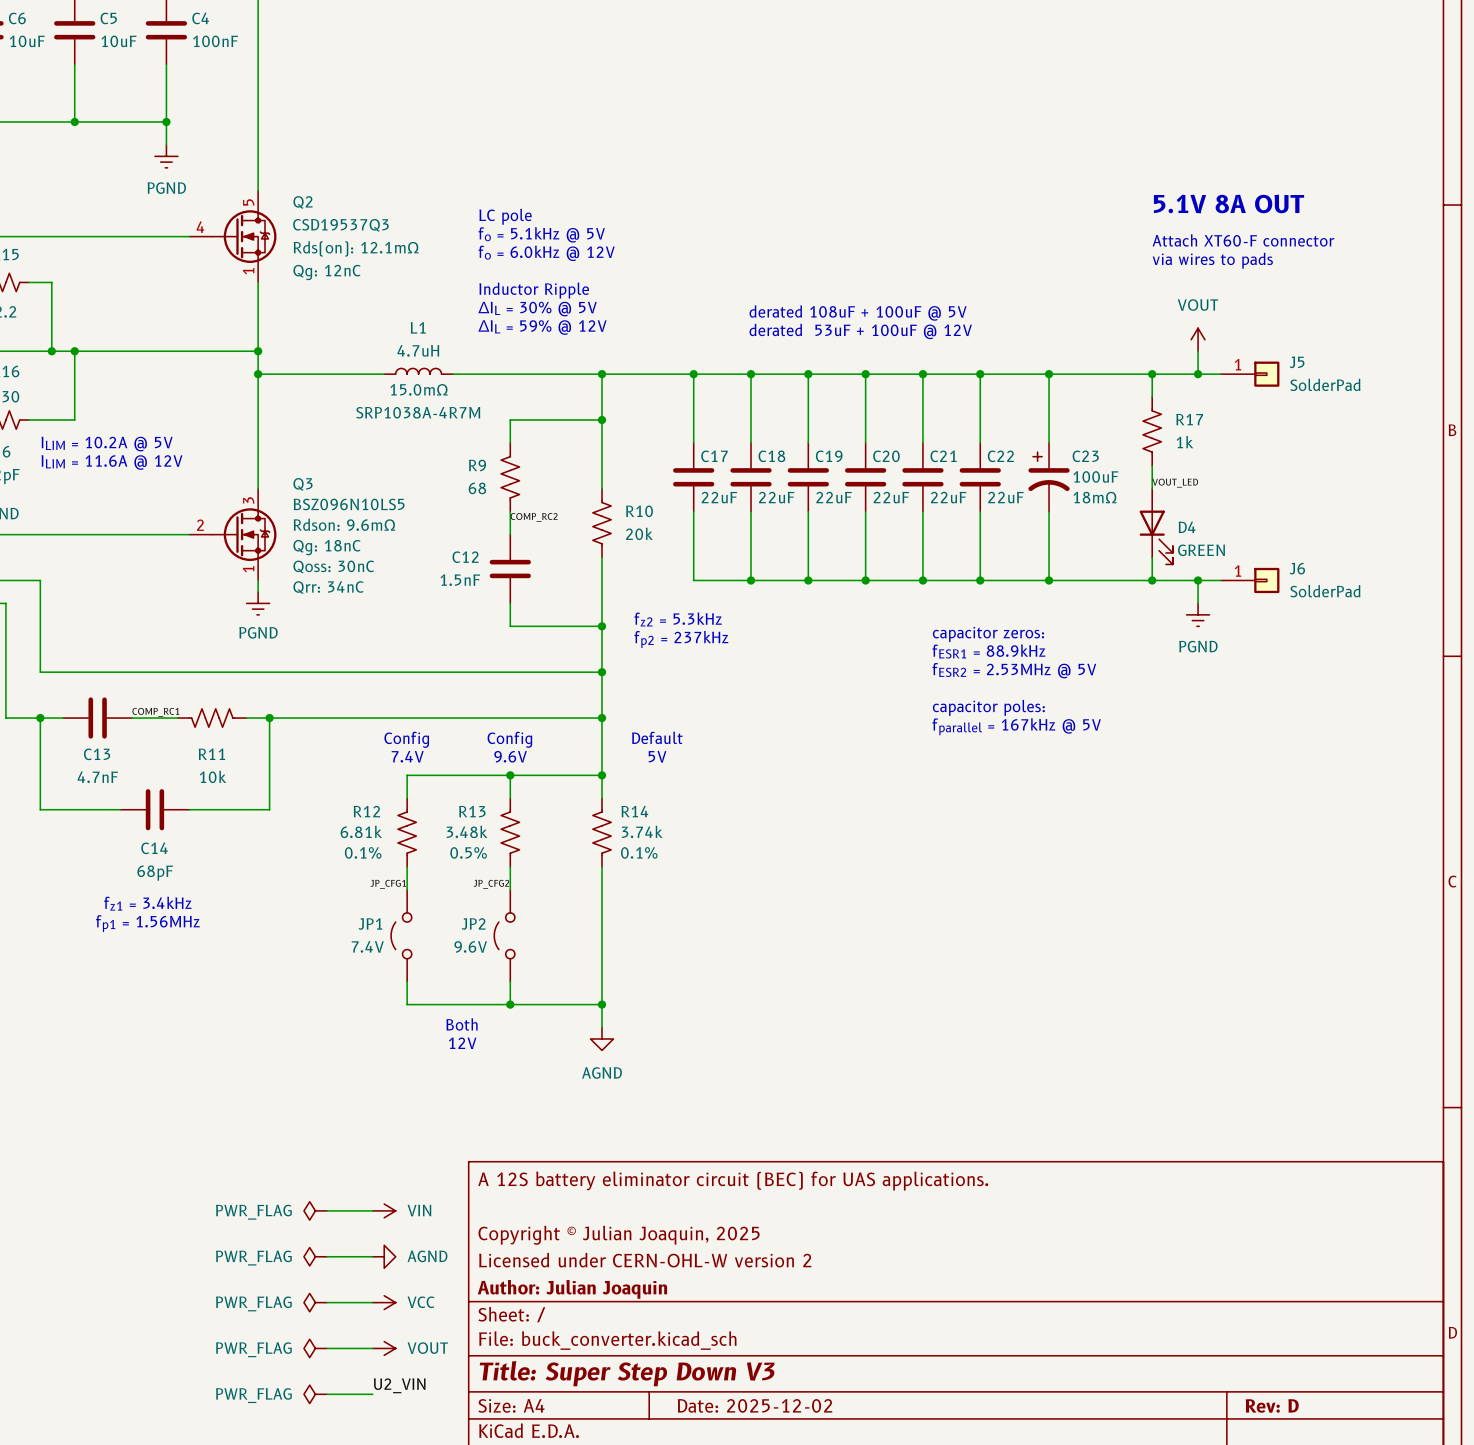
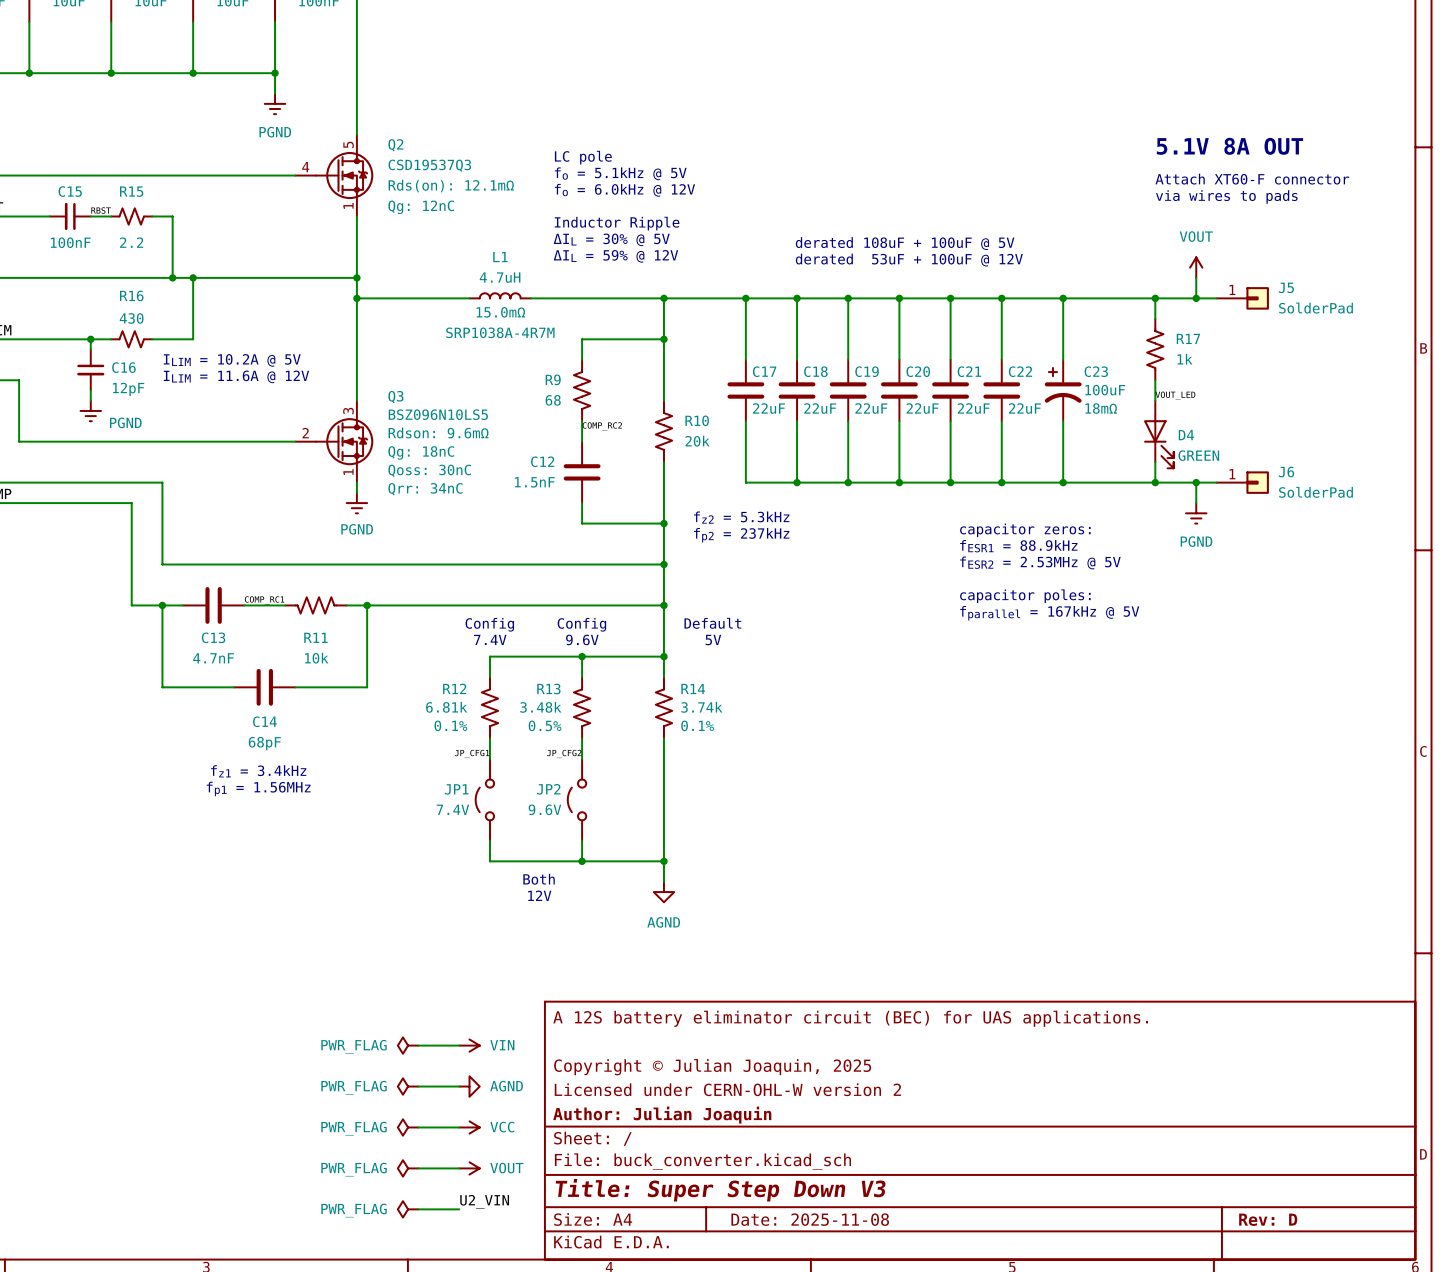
title block: Date: 2025-12-02 (755, 1405) -> Date: 2025-11-08 (810, 1219)

